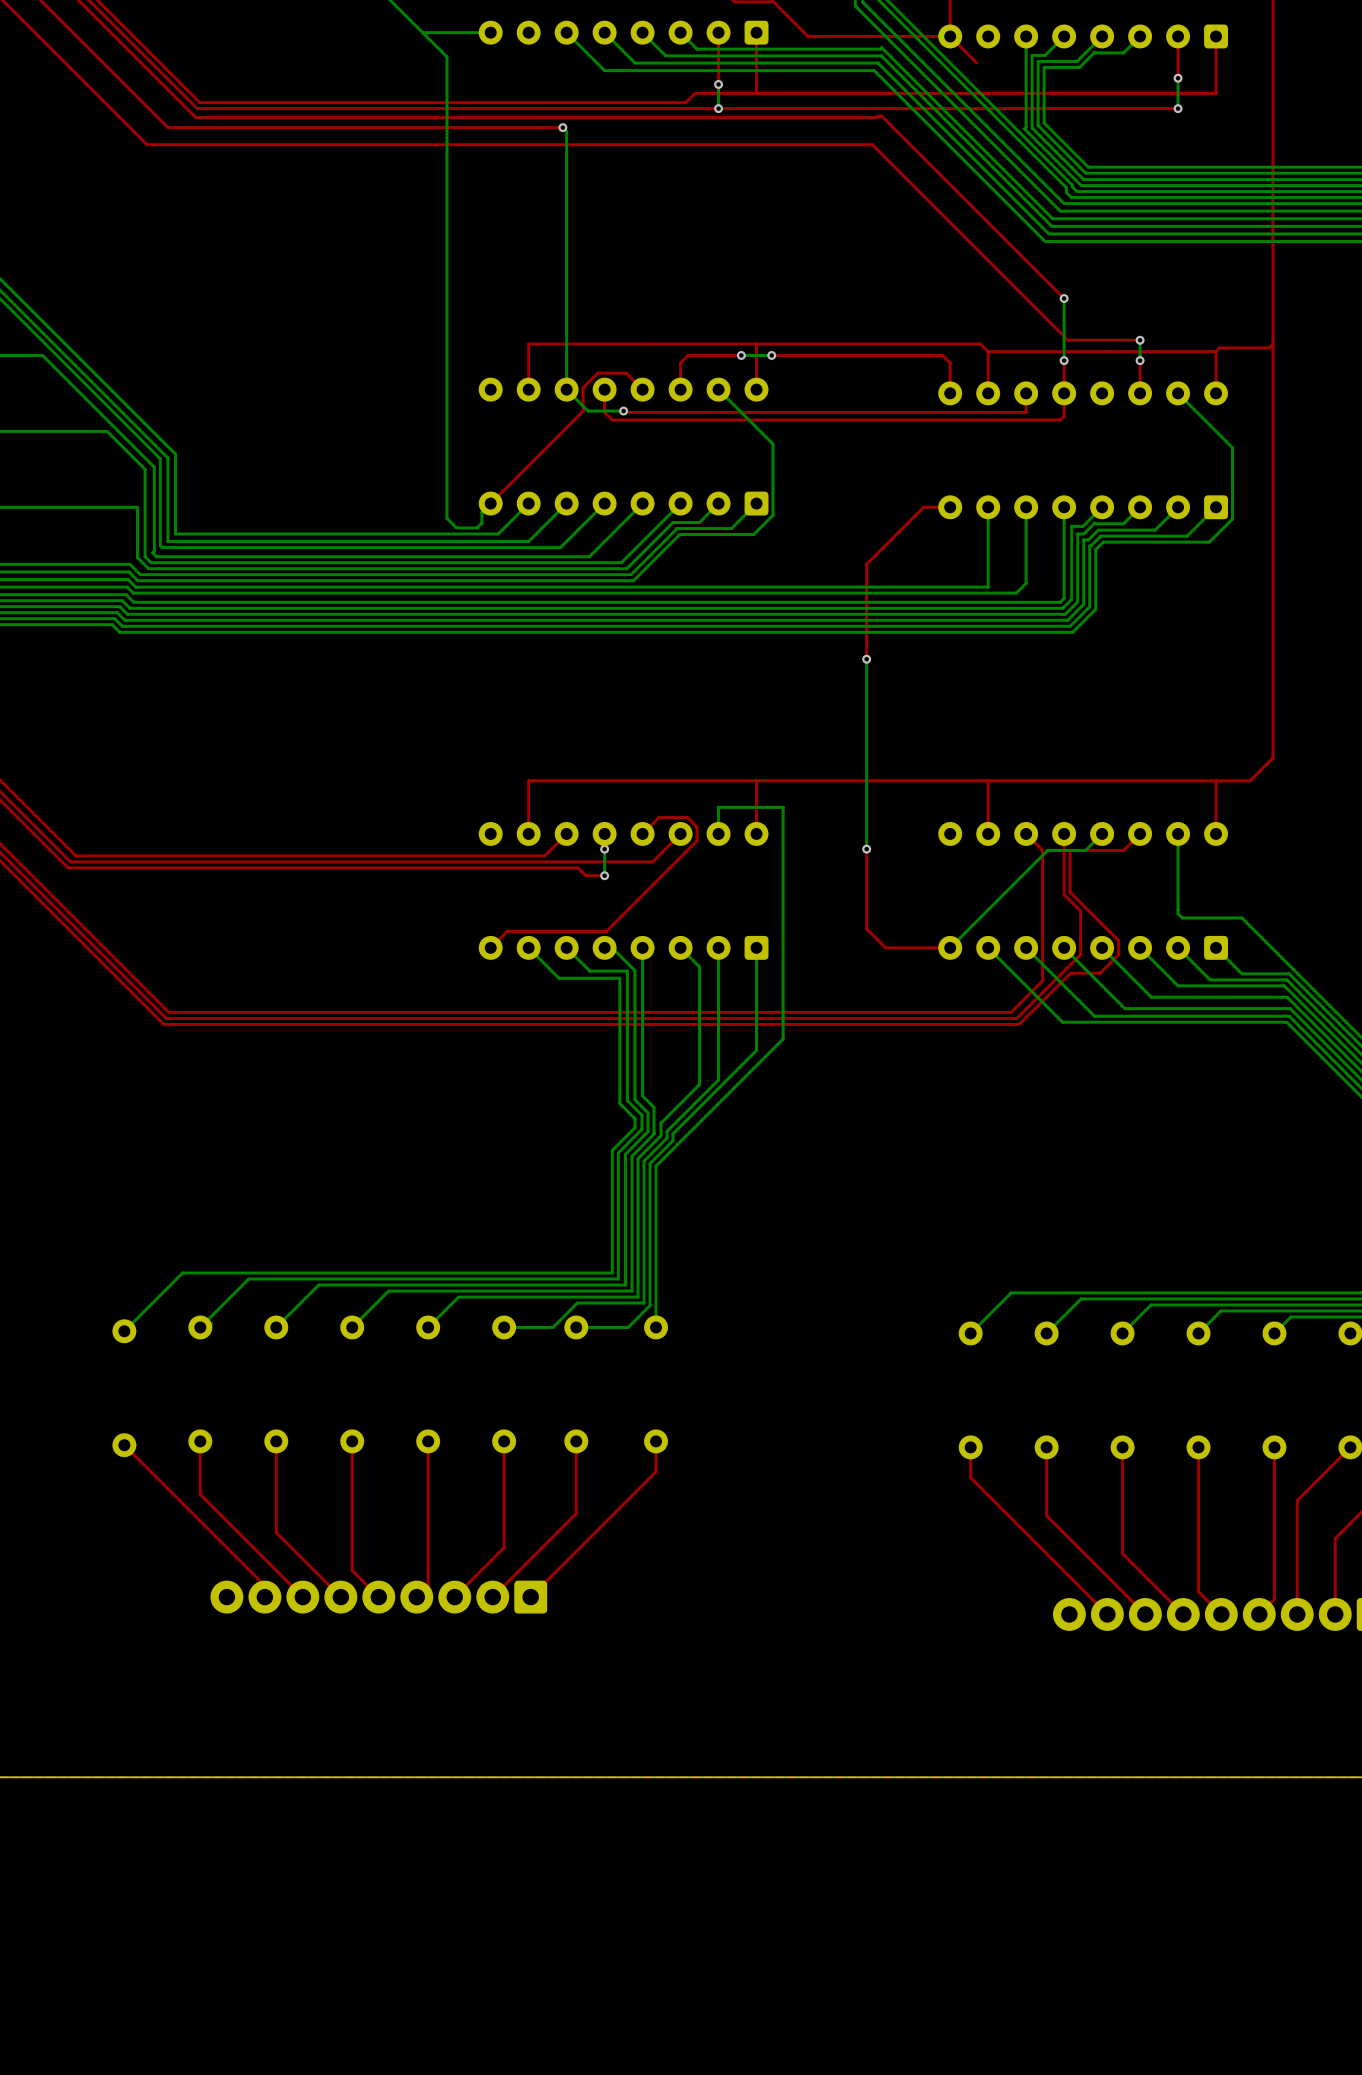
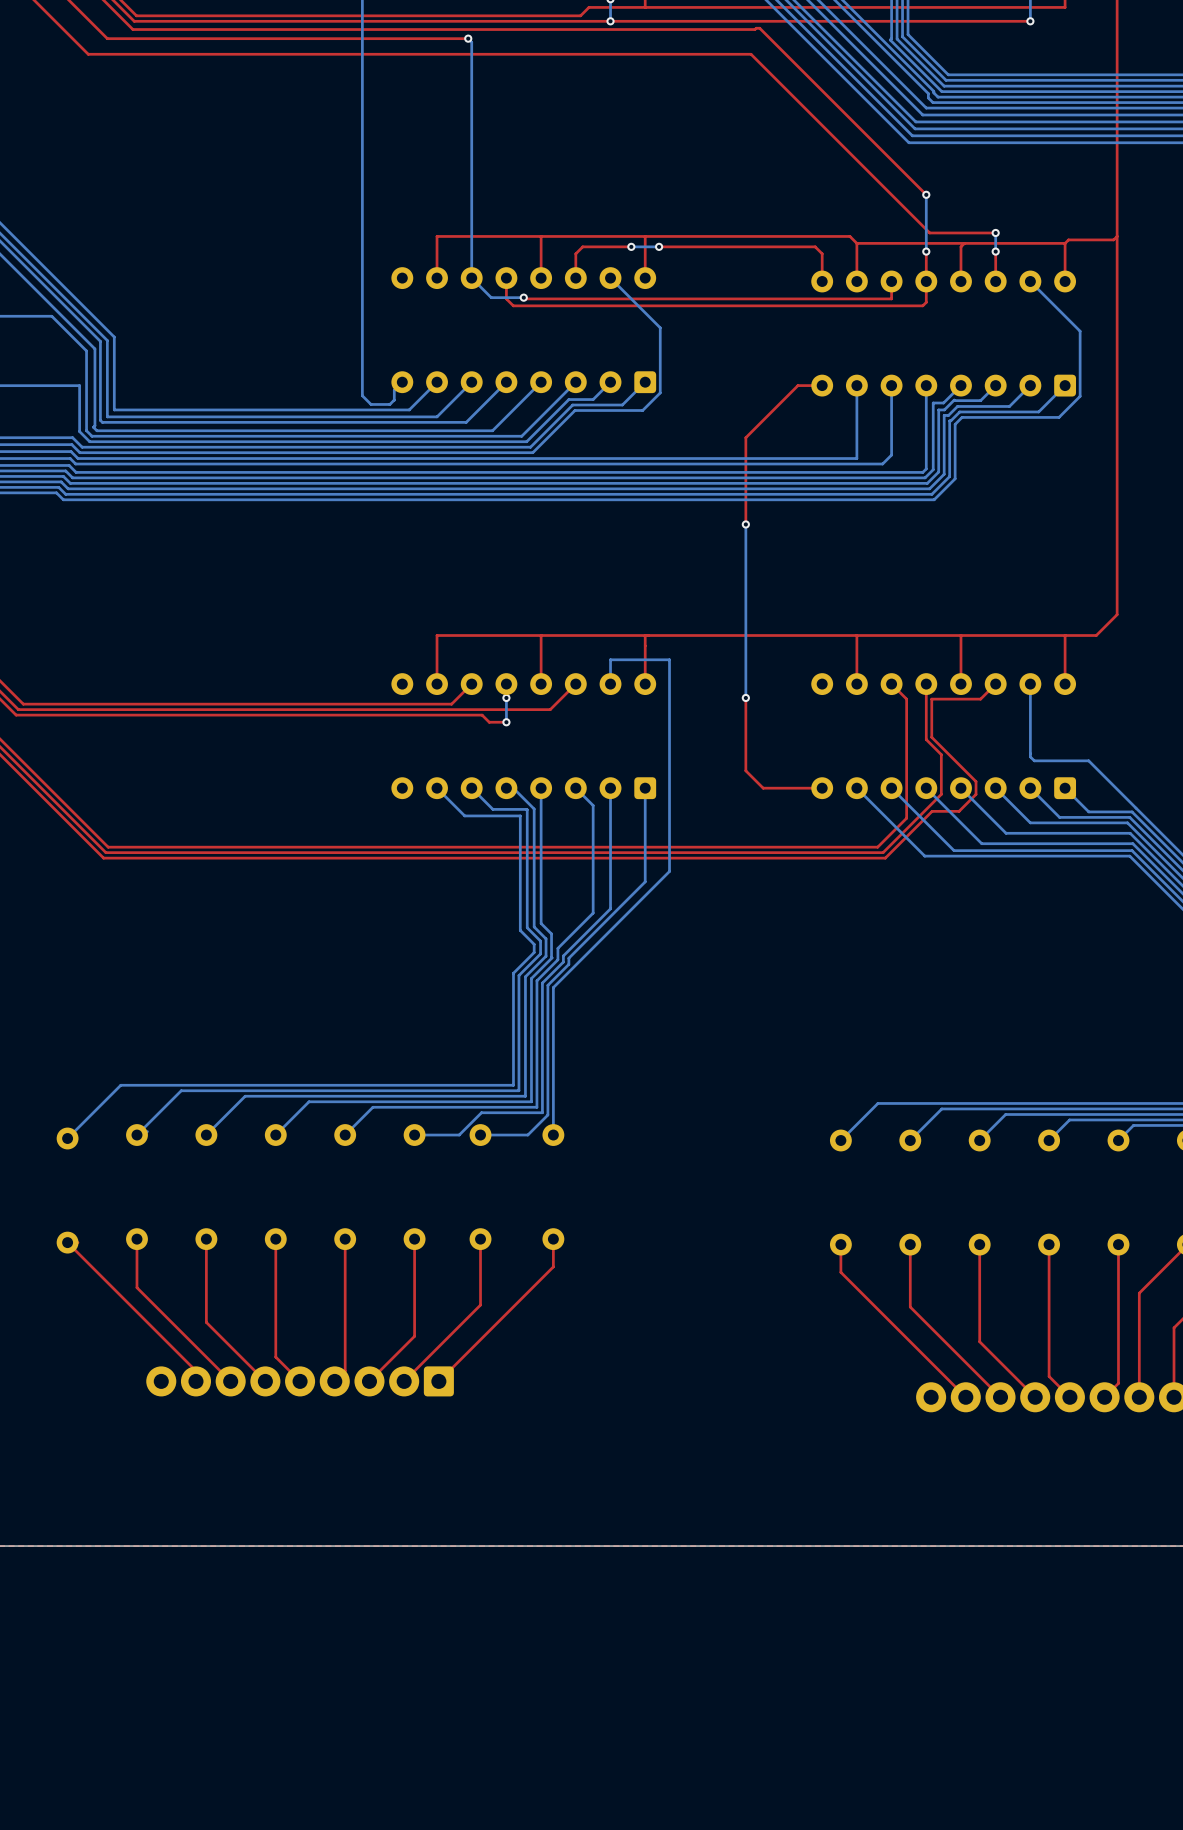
top track: none -> (964, 243) (960, 246) (960, 281)
top track: (642, 389) (626, 373) (597, 373) (583, 387) (583, 411) (490, 503) -> (541, 278) (541, 236)
top track: none -> (960, 635) (960, 684)
top track: (642, 833) (659, 817) (687, 817) (697, 827) (697, 840) (606, 931) (507, 931) (490, 947) -> (541, 684) (541, 635)
bottom track: (1102, 833) (1085, 850) (1047, 850) (950, 947) -> none

